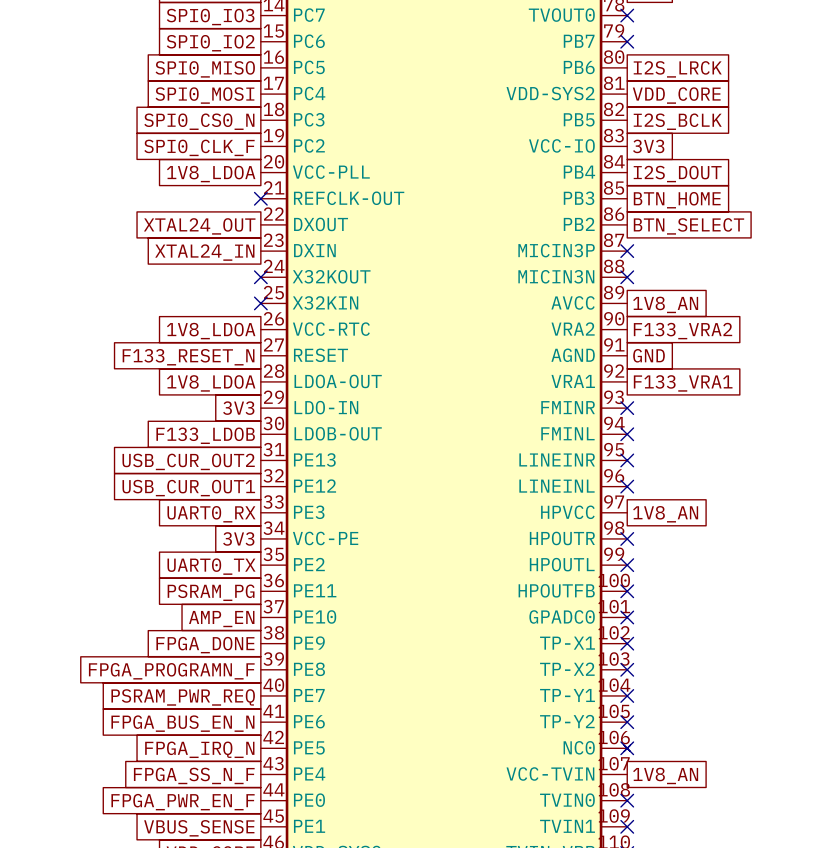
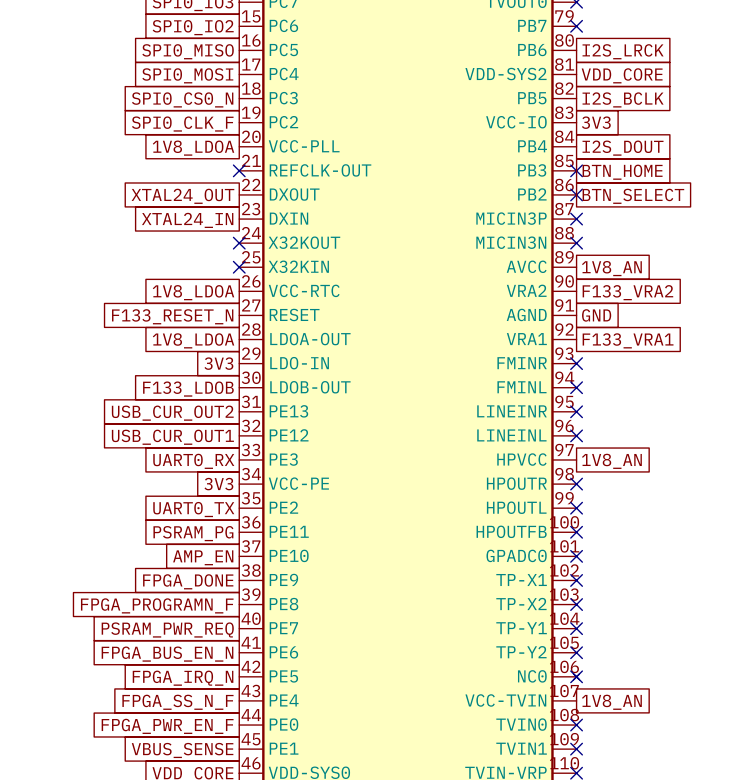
no-connect mark: none -> (576, 170)
no-connect mark: none -> (576, 194)

